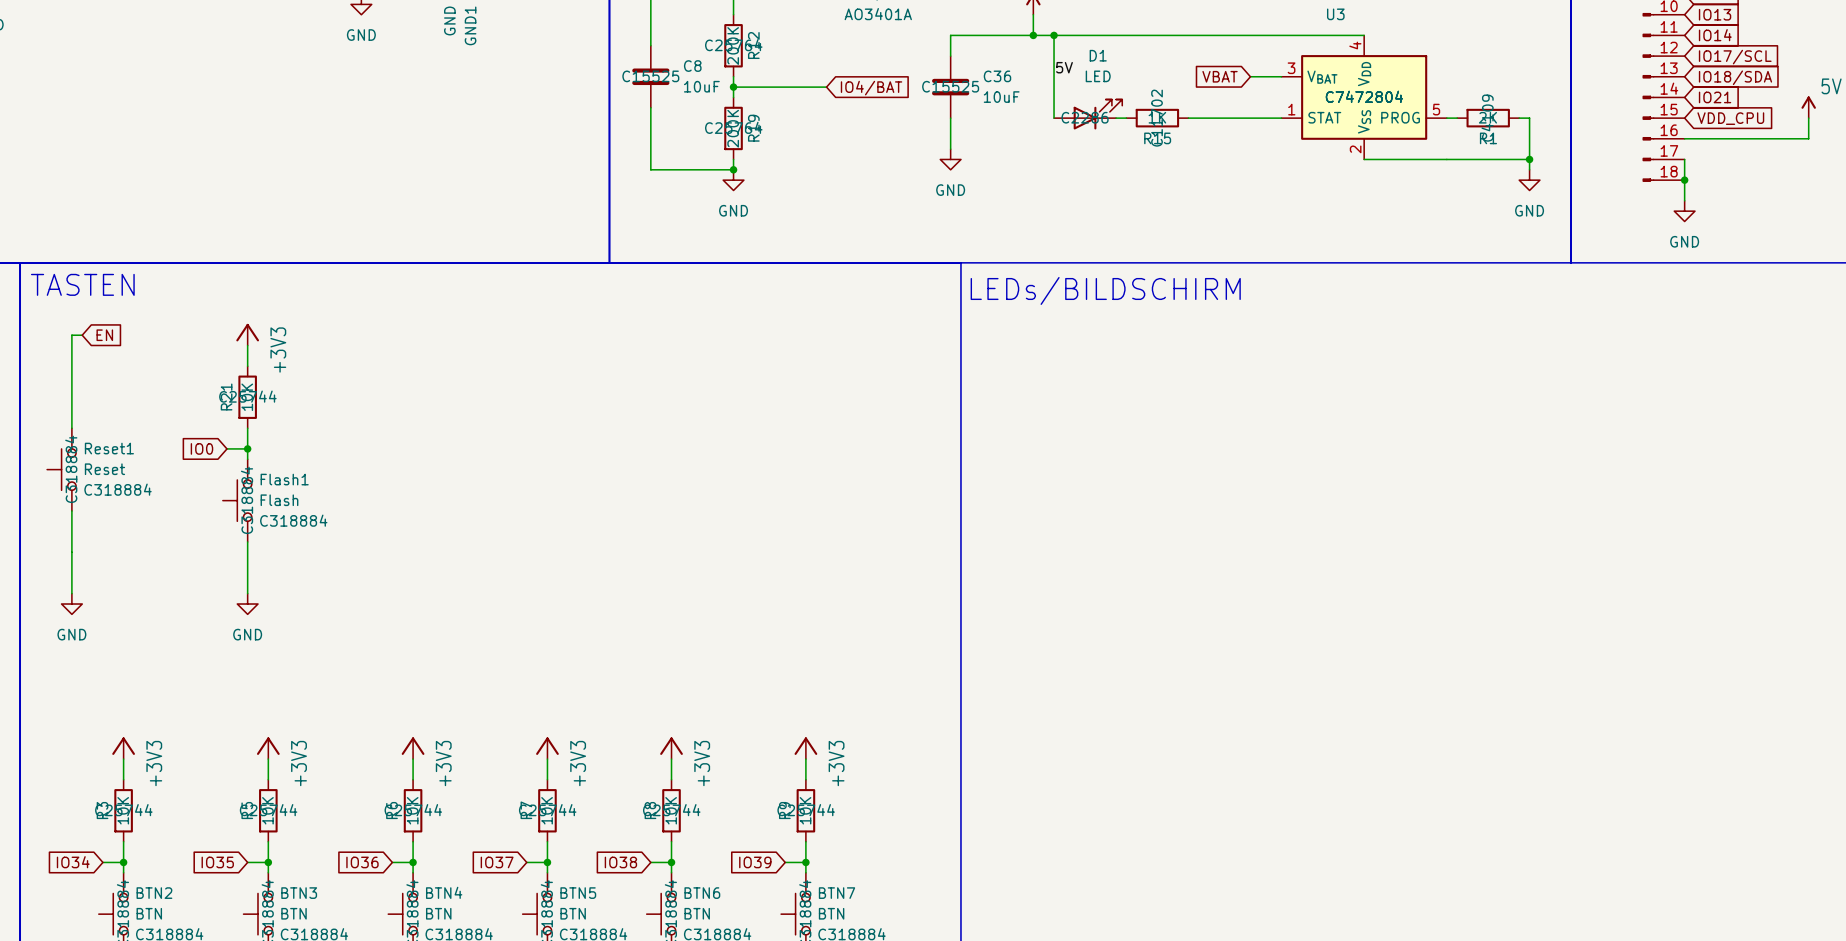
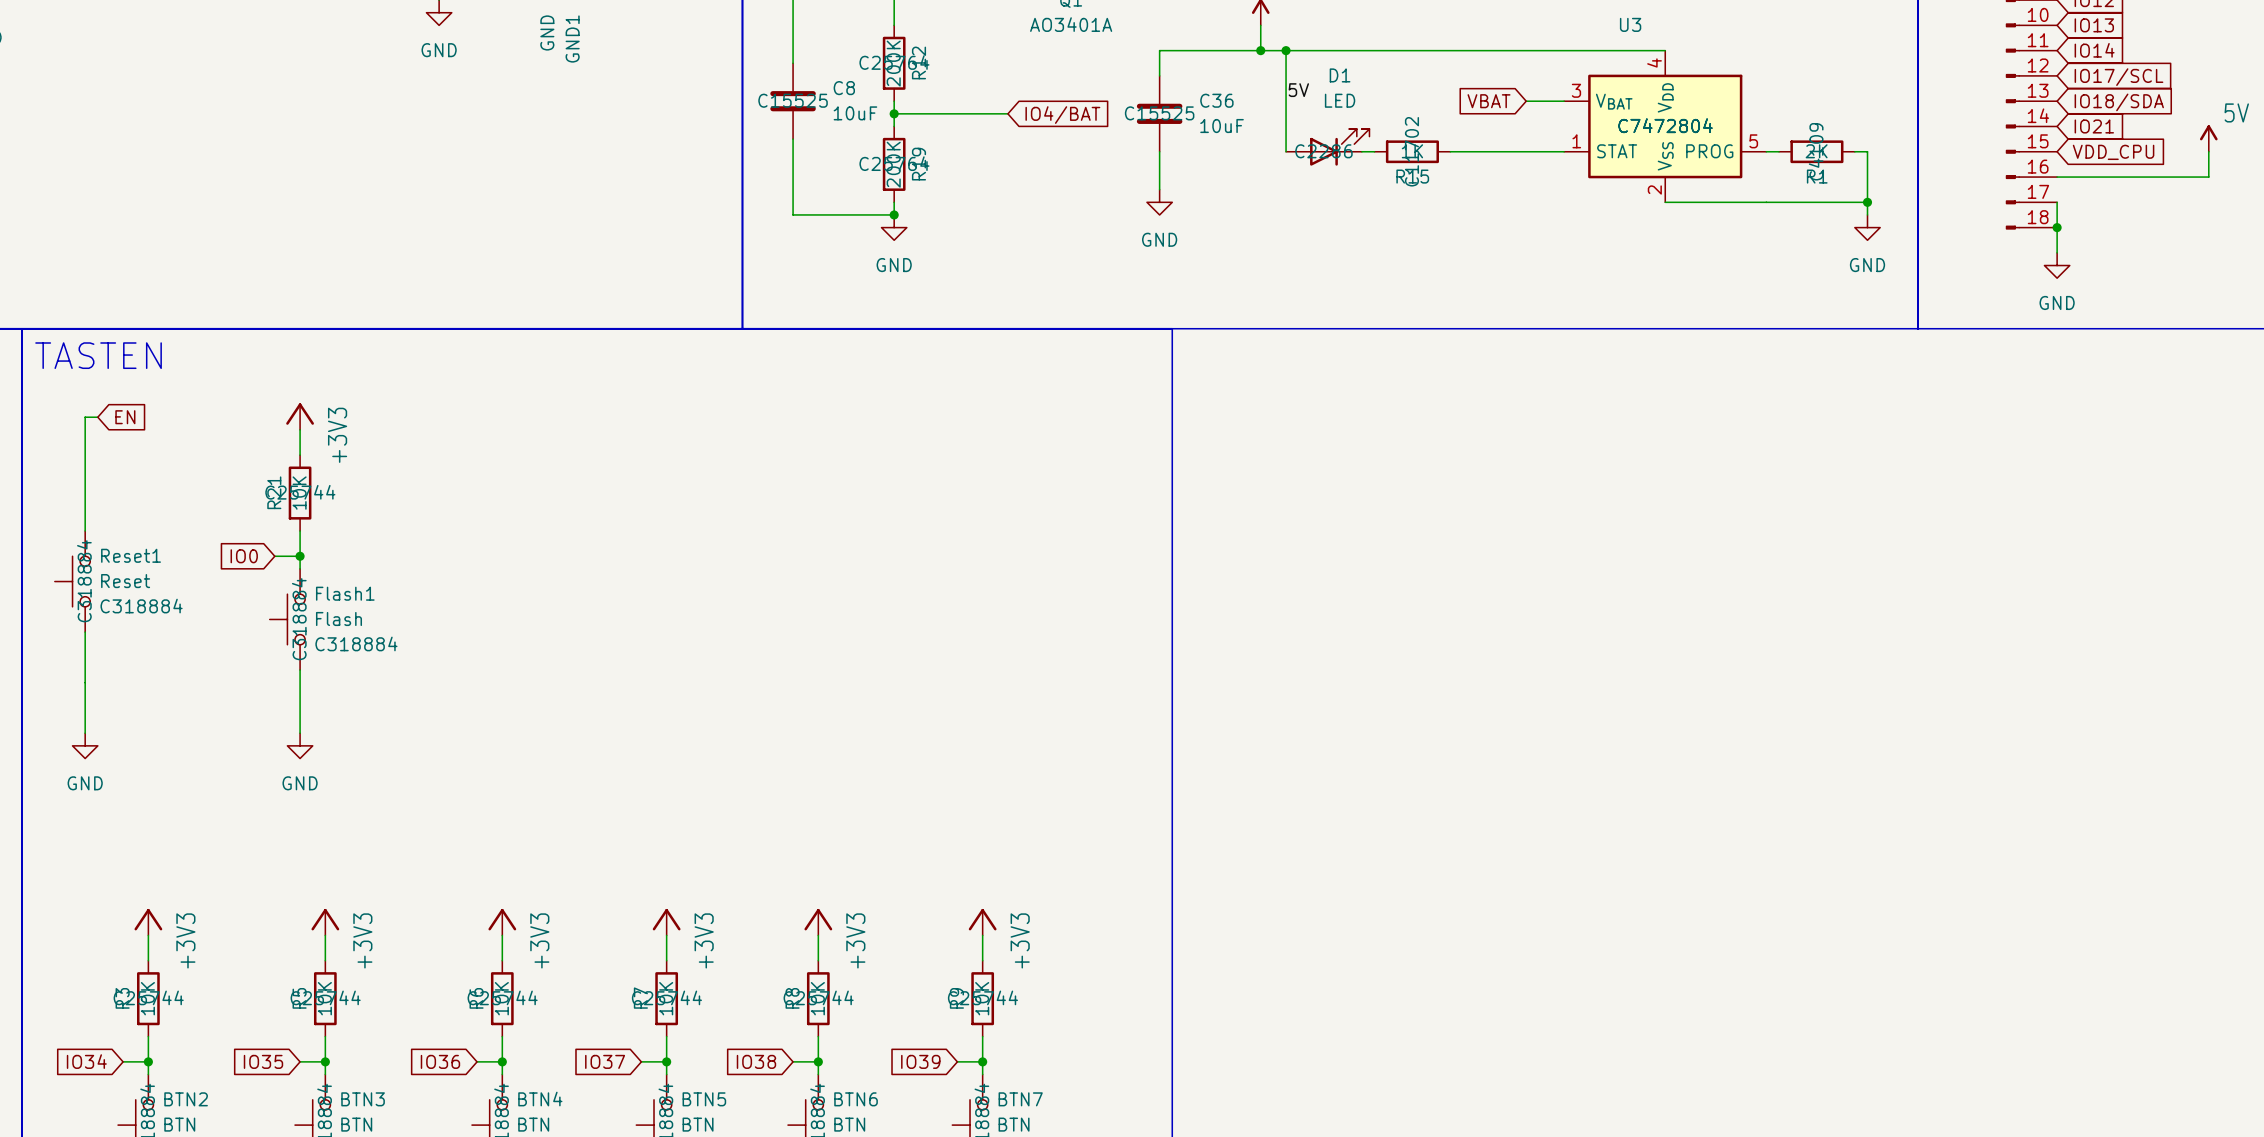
text: LEDs/BILDSCHIRM (1105, 290) -> none

